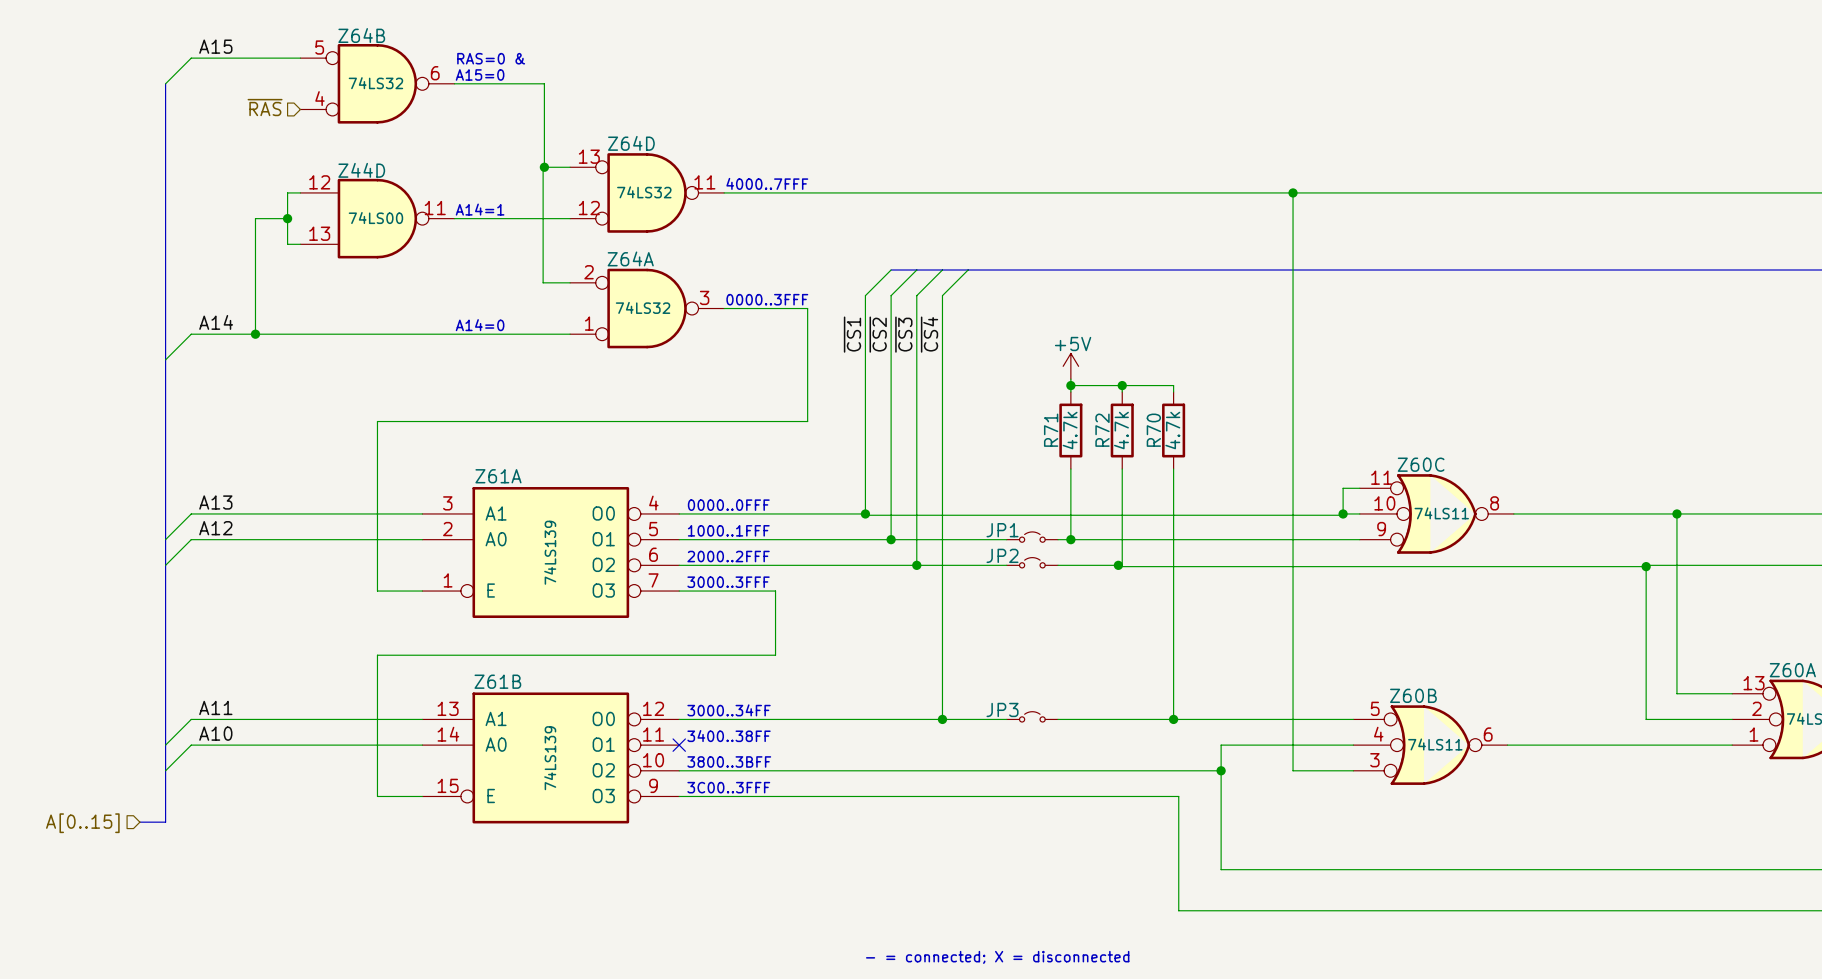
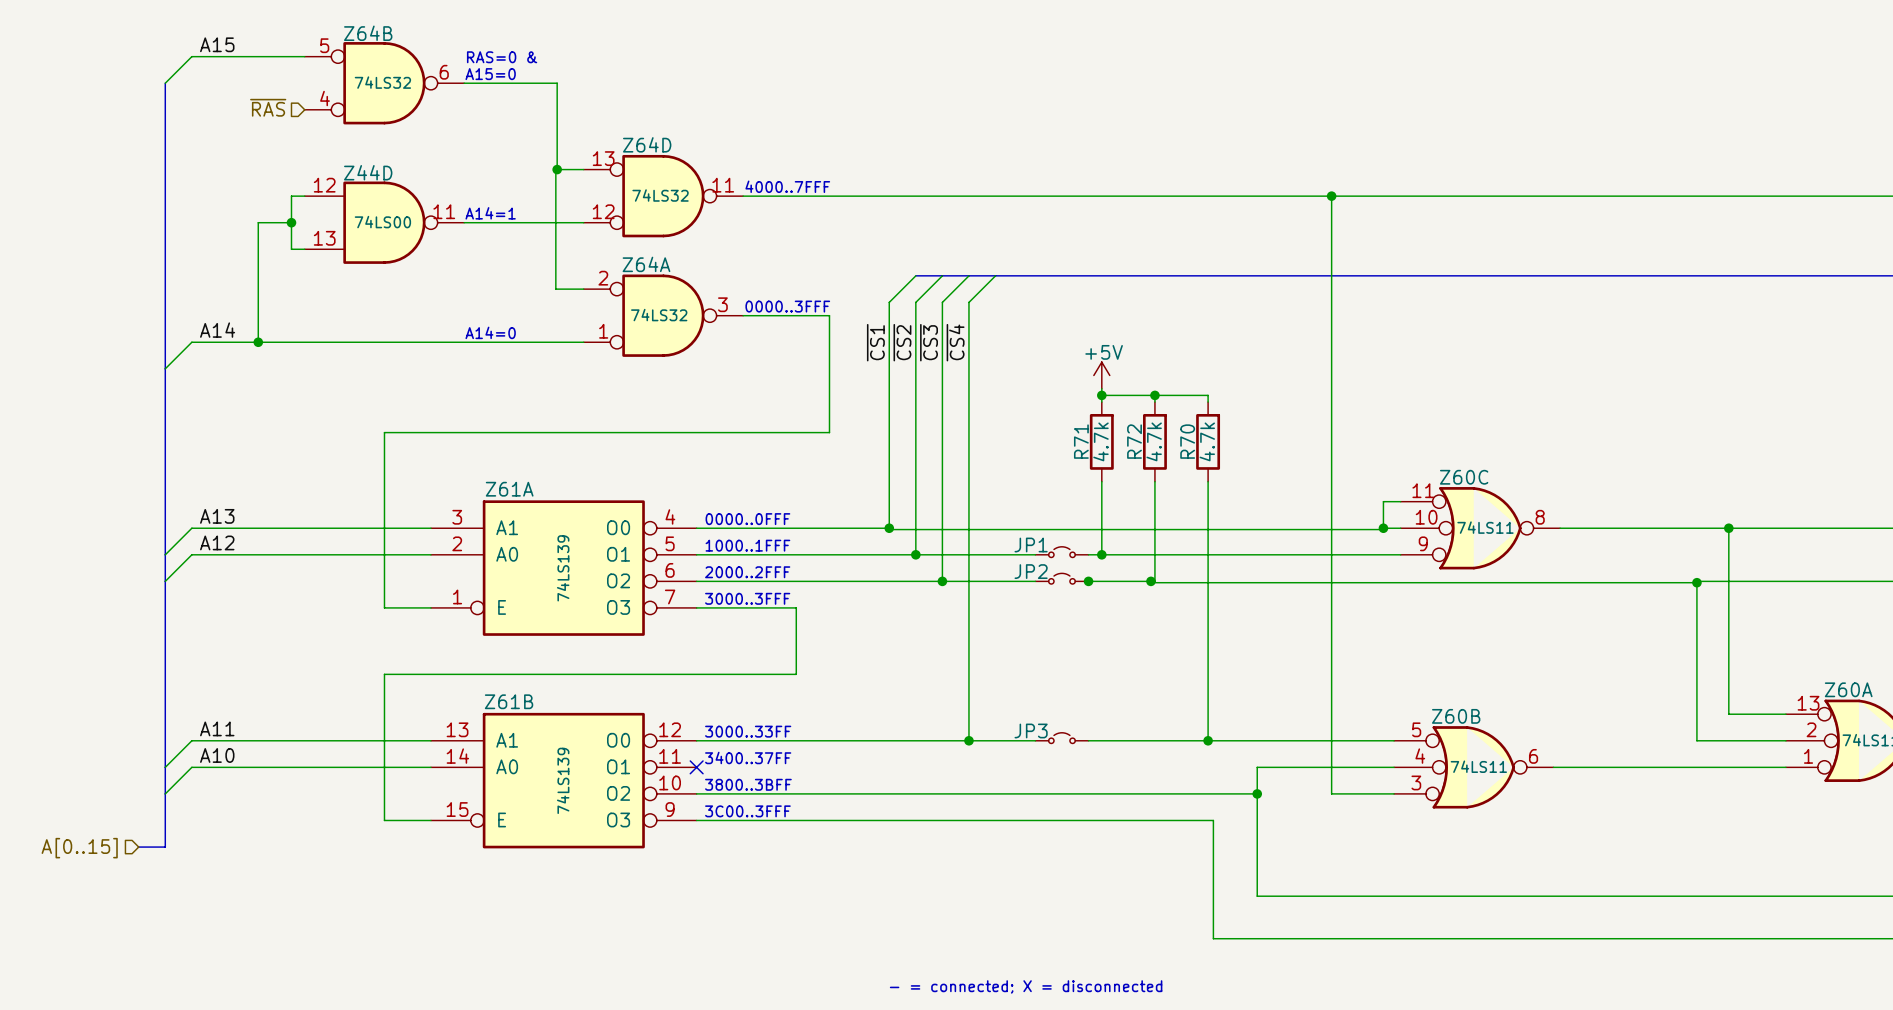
junction: none -> (1088, 581)
text: 3000..34FF (729, 710) -> 3000..33FF (748, 731)
text: 3400..38FF (729, 736) -> 3400..37FF (748, 757)

